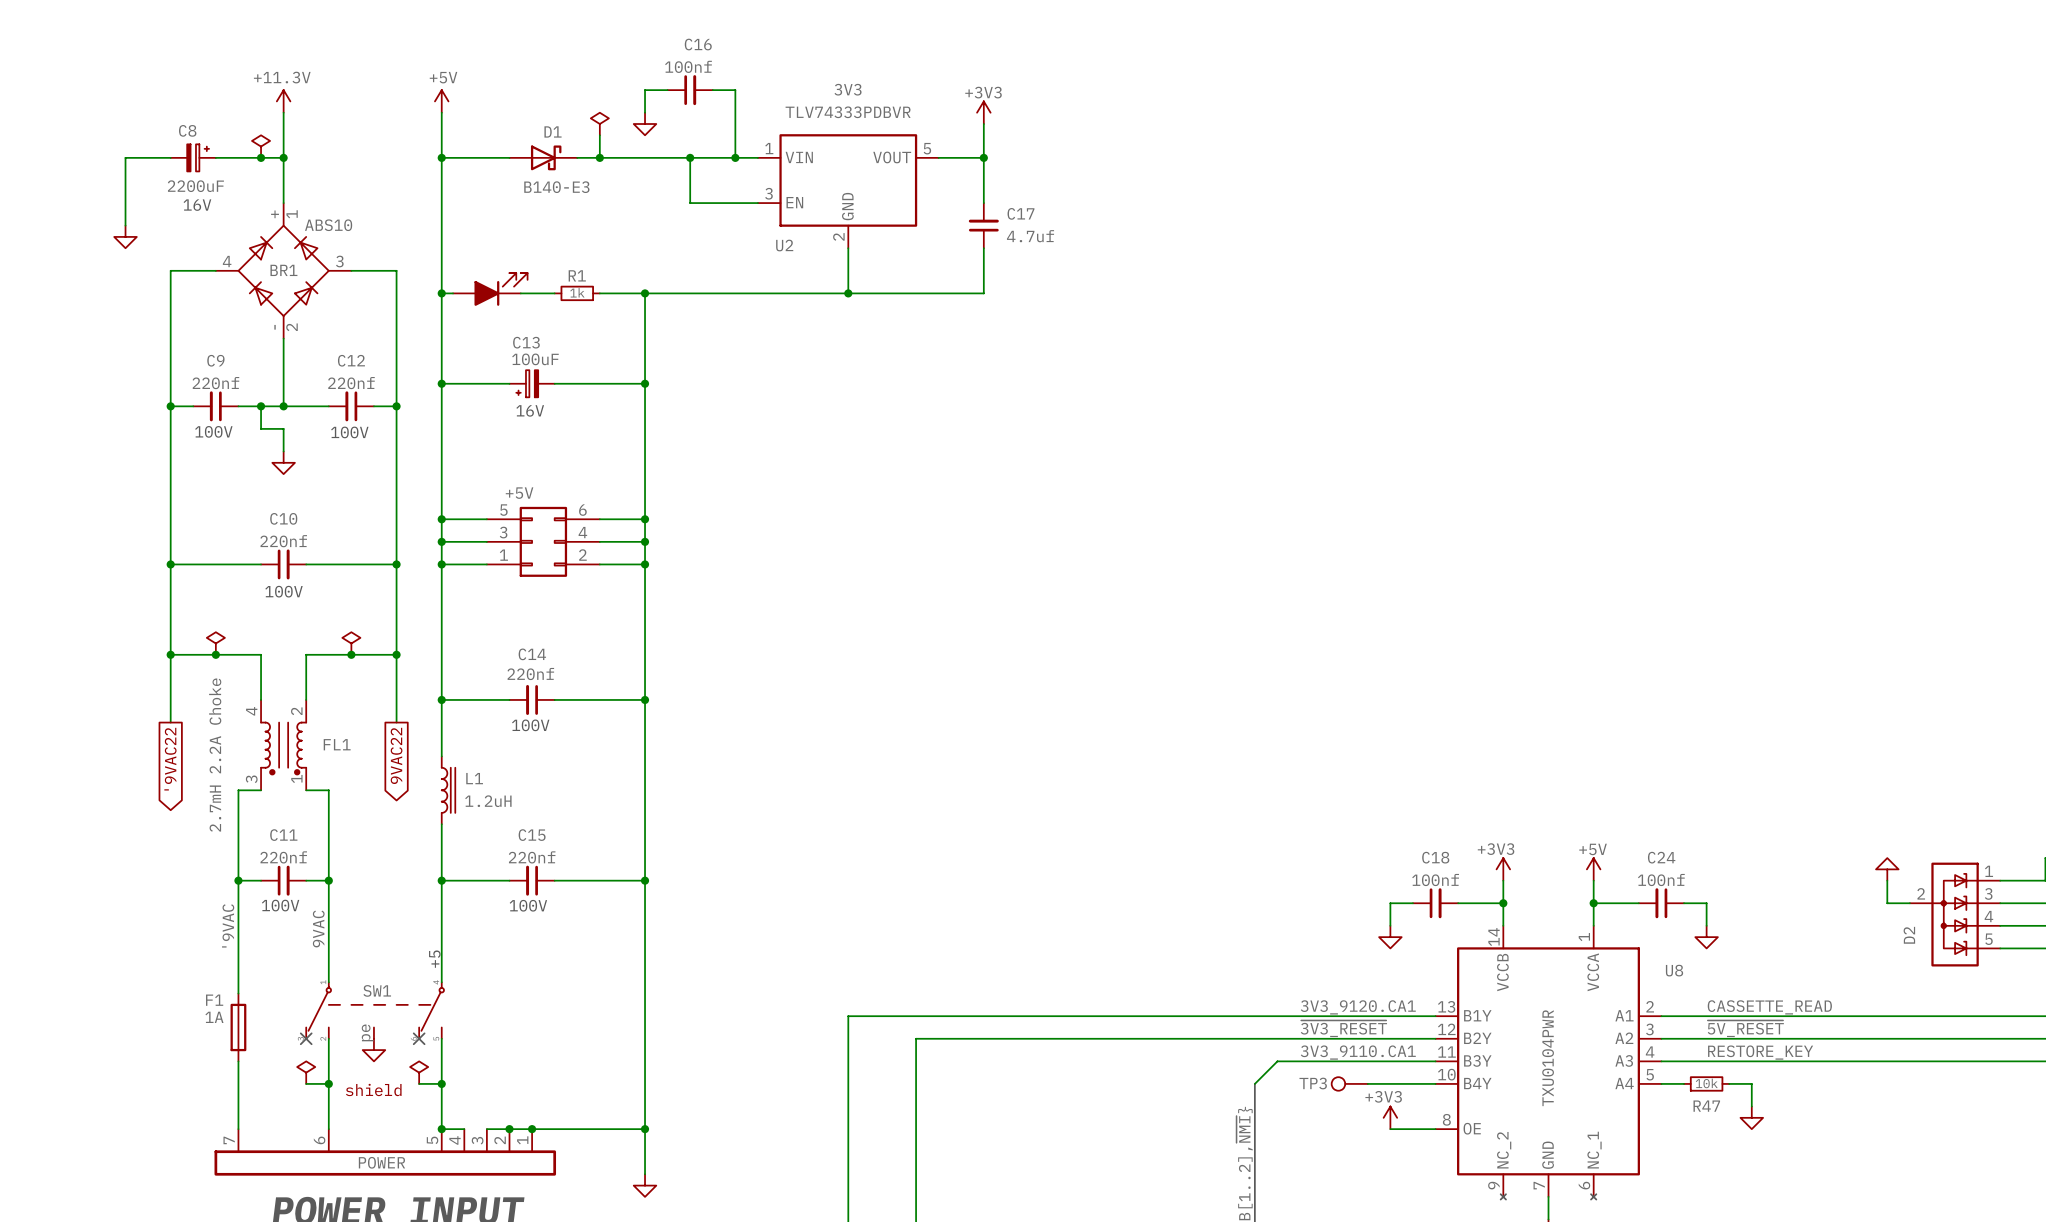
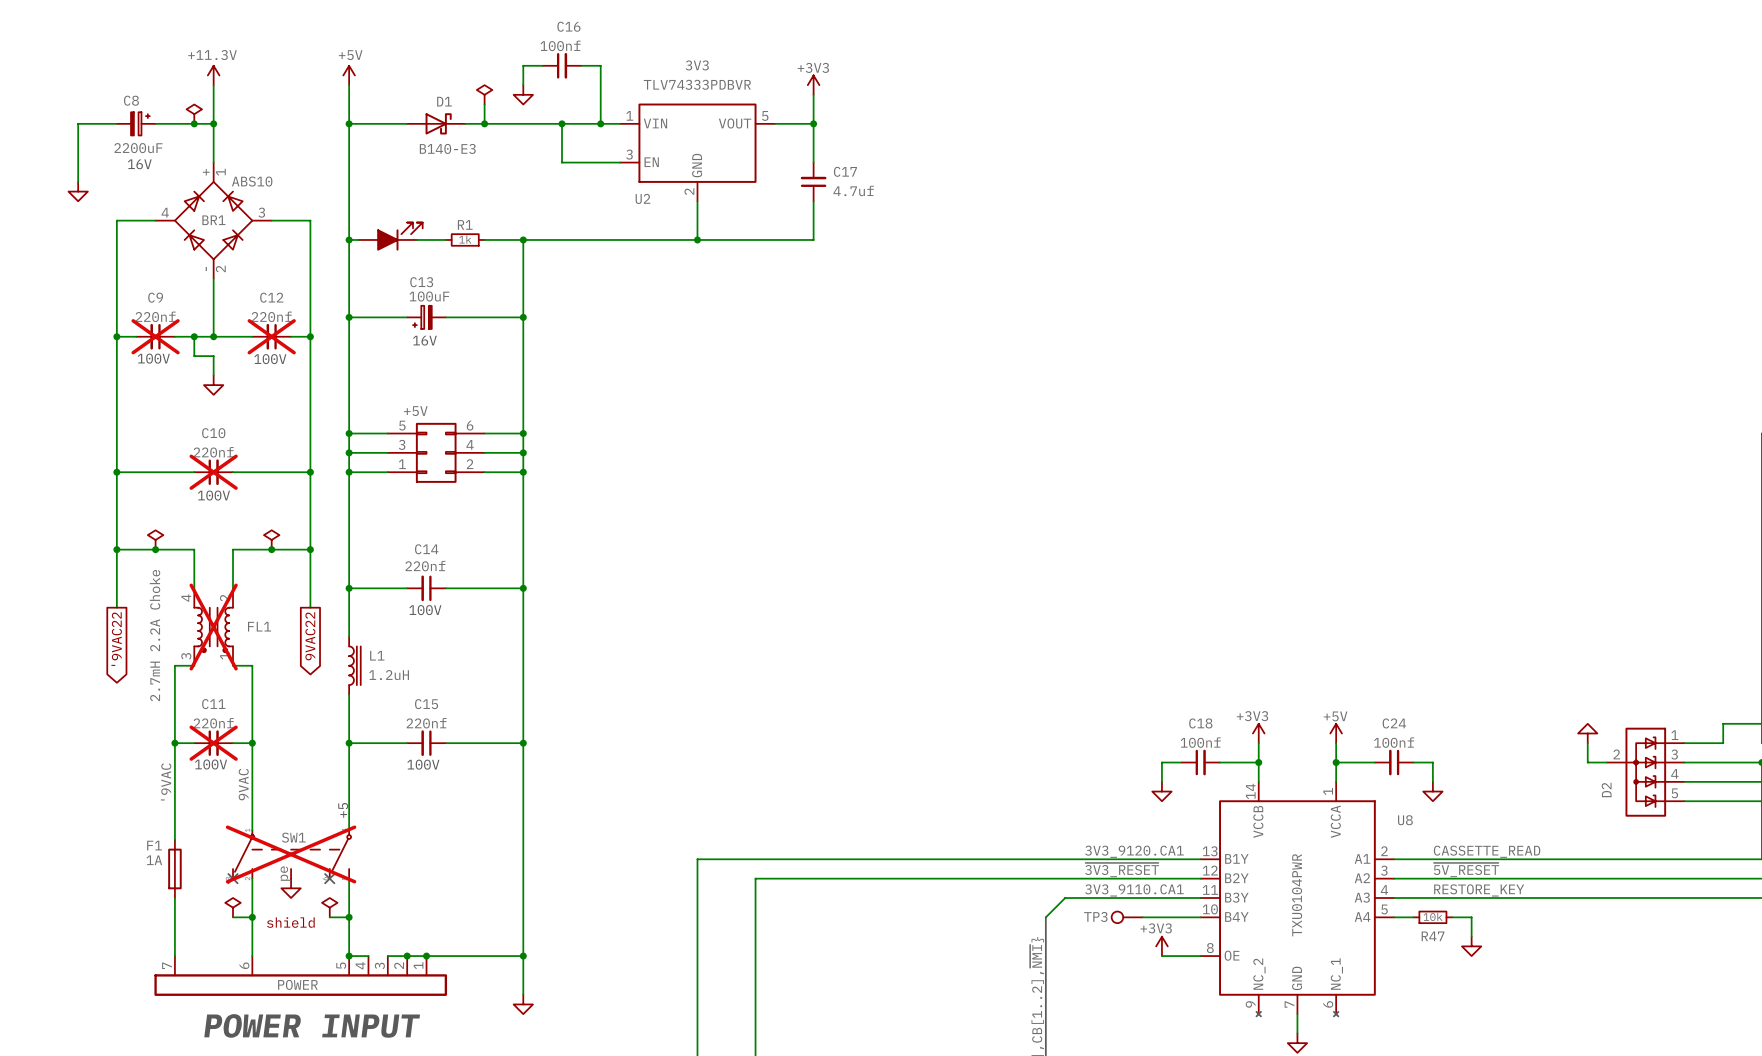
C9 do-not-place cross: none -> (155, 336)
C12 do-not-place cross: none -> (271, 336)
C10 do-not-place cross: none -> (213, 472)
FL1 do-not-place cross: none -> (213, 627)
C11 do-not-place cross: none -> (213, 743)
SW1 do-not-place cross: none -> (291, 854)

